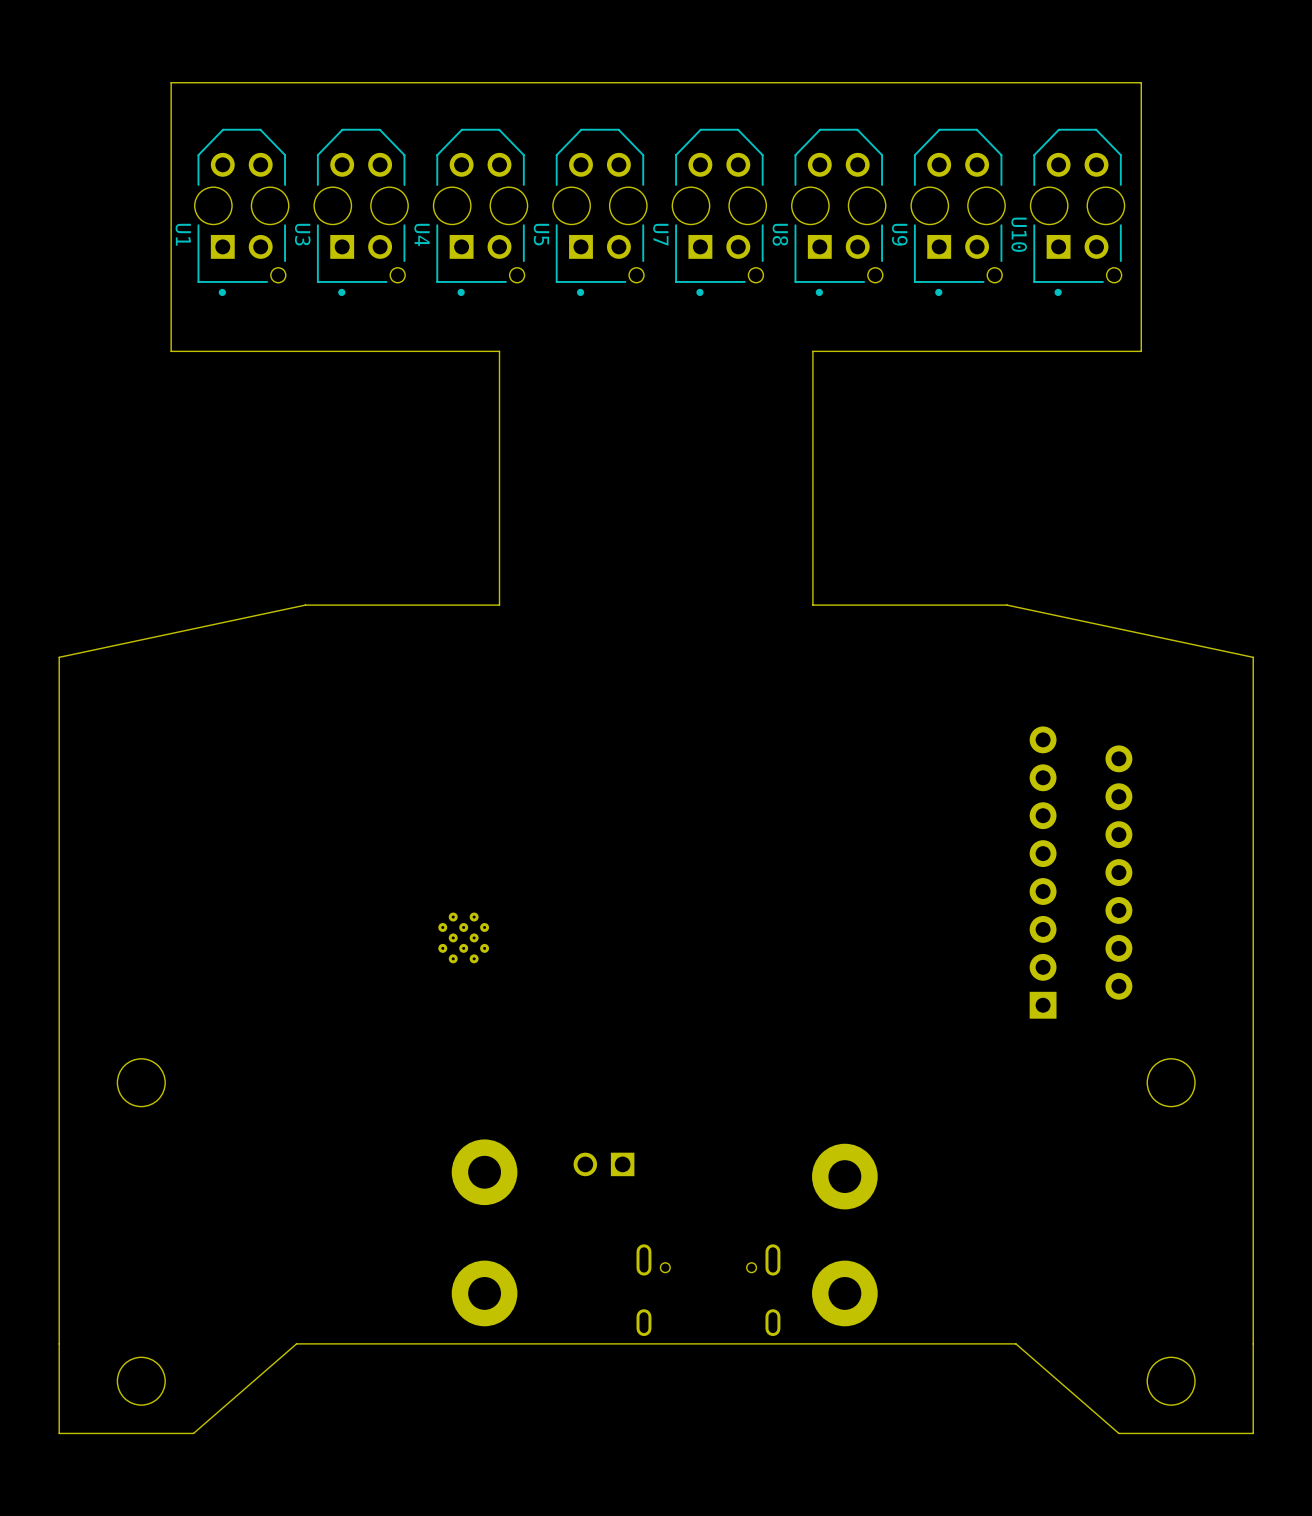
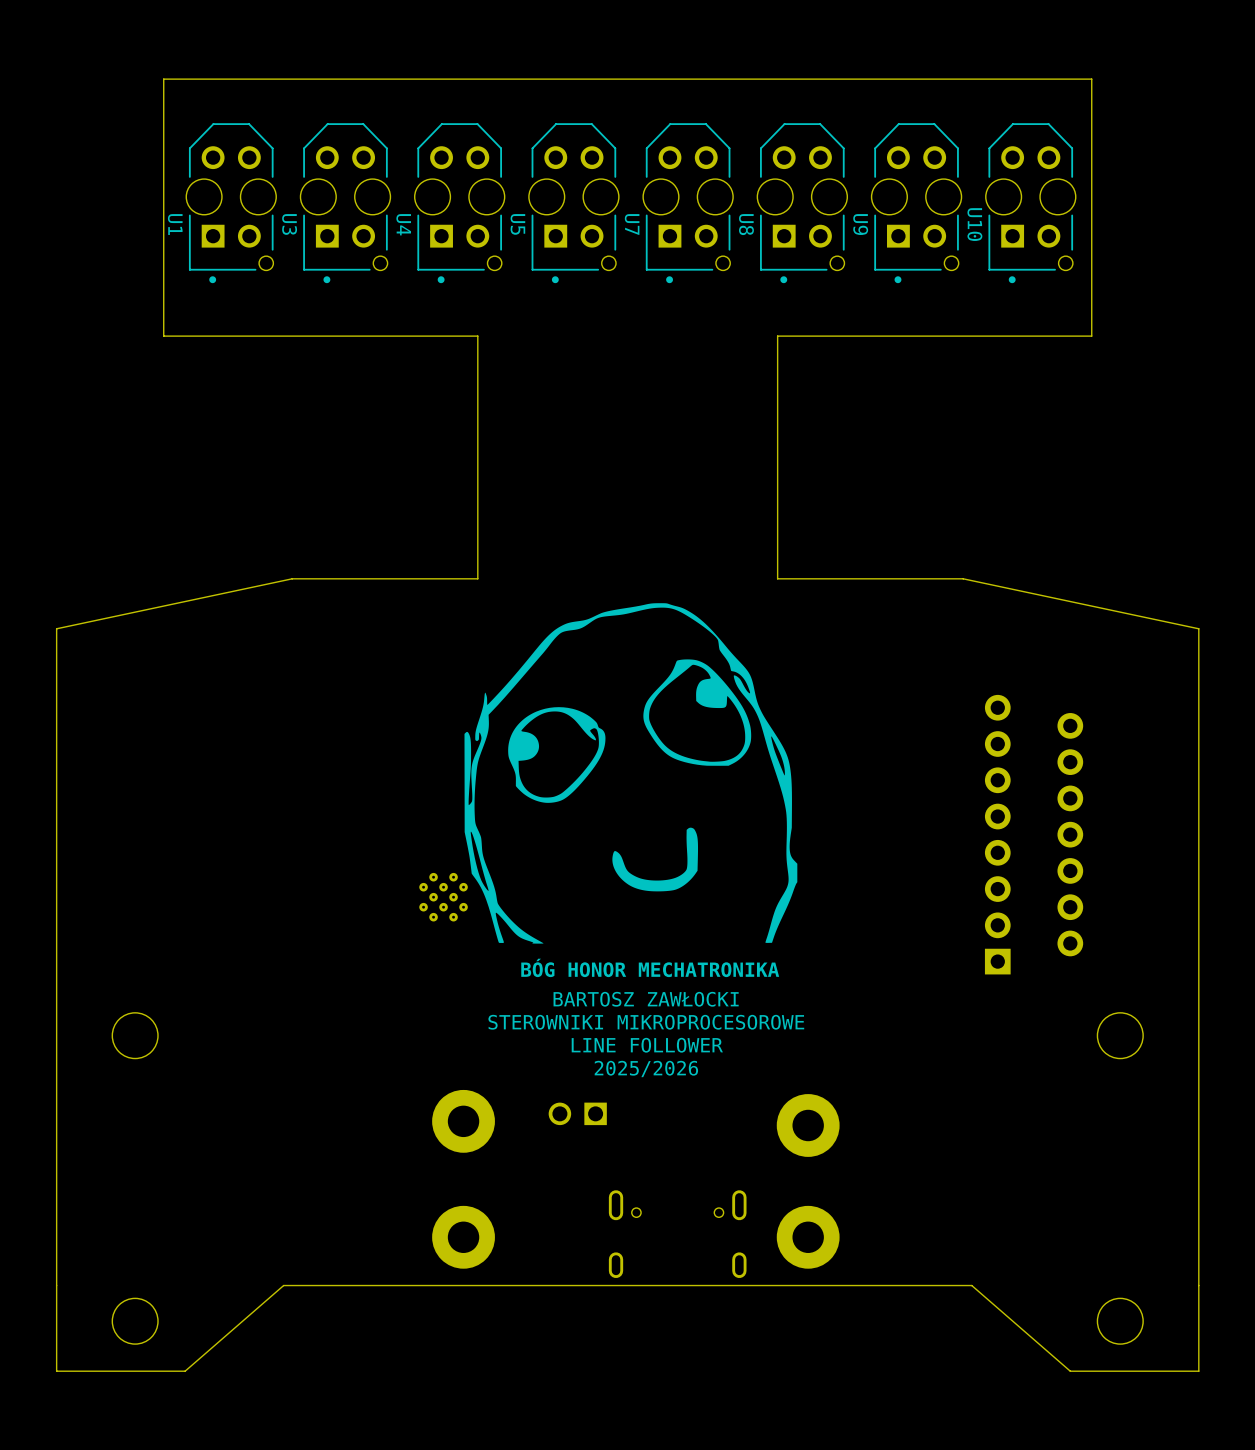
drawing: none -> [464, 603, 798, 944]
text: none -> BÓG HONOR MECHATRONIKA (650, 967)
text: none -> BARTOSZ ZAWŁOCKI (646, 999)
text: none -> STEROWNIKI MIKROPROCESOROWE (646, 1022)
text: none -> LINE FOLLOWER (647, 1045)
text: none -> 2025/2026 (646, 1068)

